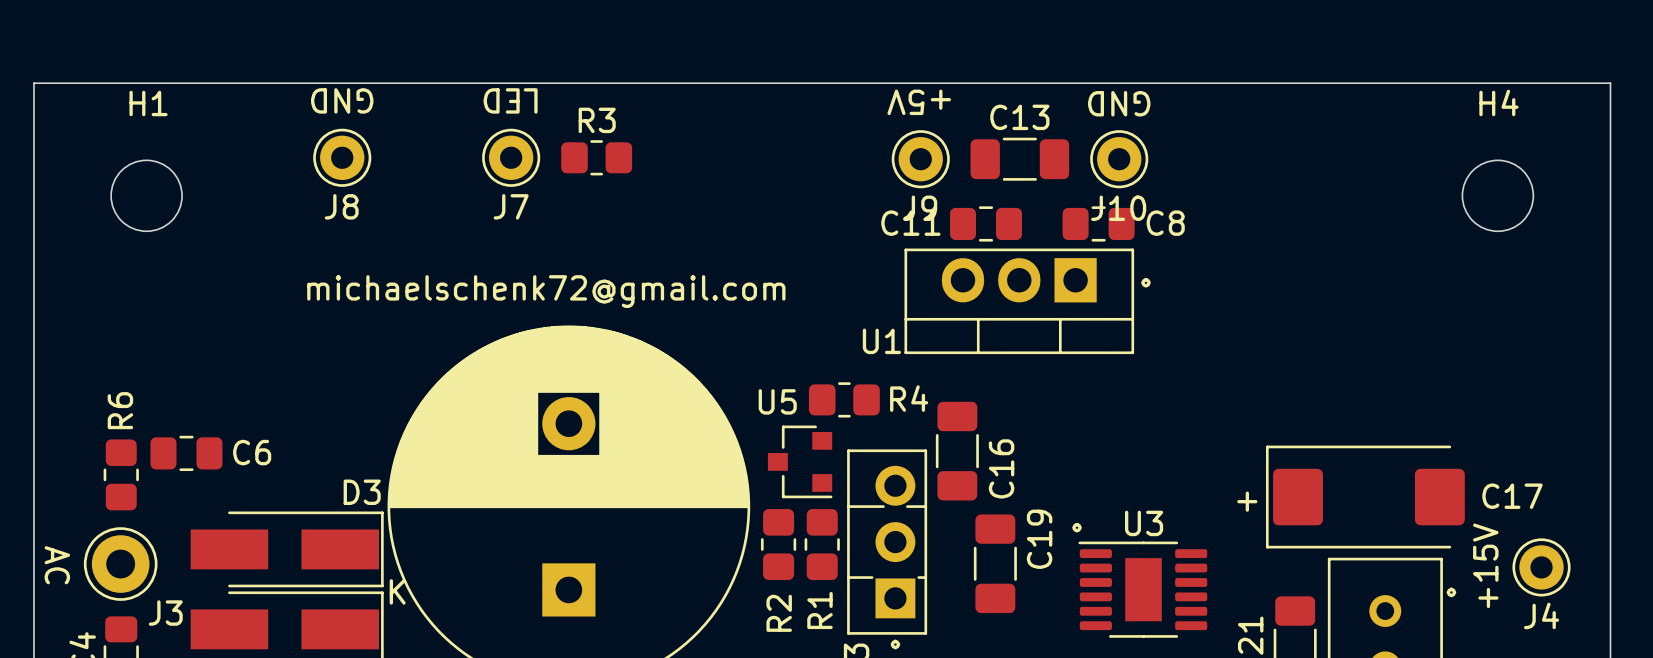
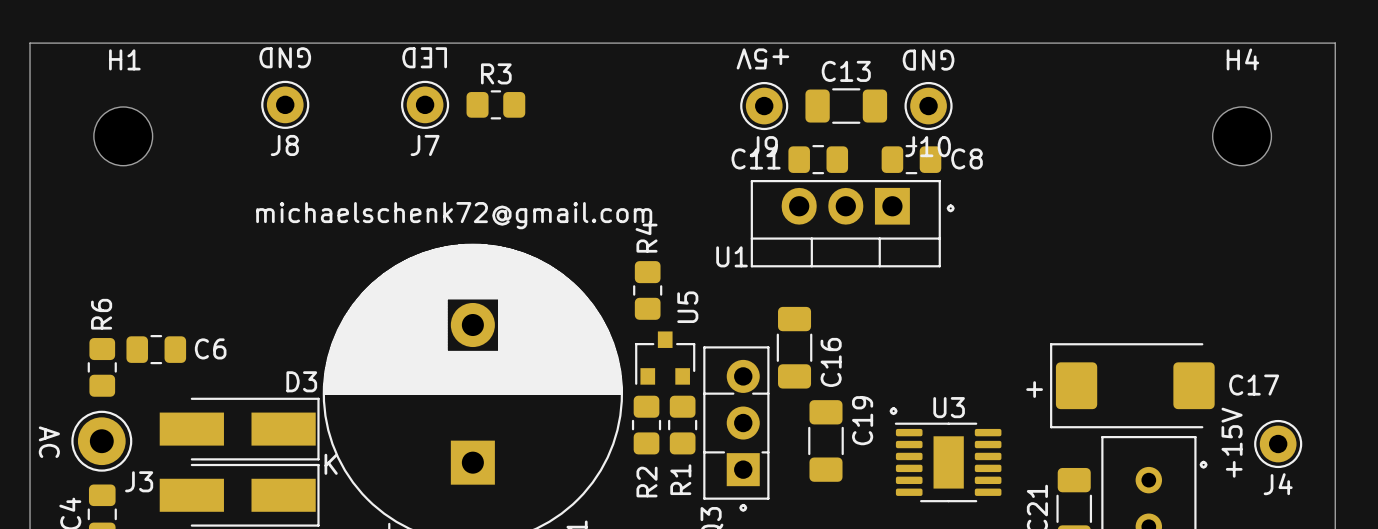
R4 name position: R4 (909, 398) -> R4 (646, 236)
R4 rotation: 0° (844, 399) -> 90° clockwise (647, 290)
R4 position: (844, 399) -> (647, 290)
U5 name position: U5 (777, 401) -> U5 (687, 307)
U5 rotation: 0° (800, 461) -> 90° clockwise (665, 358)

